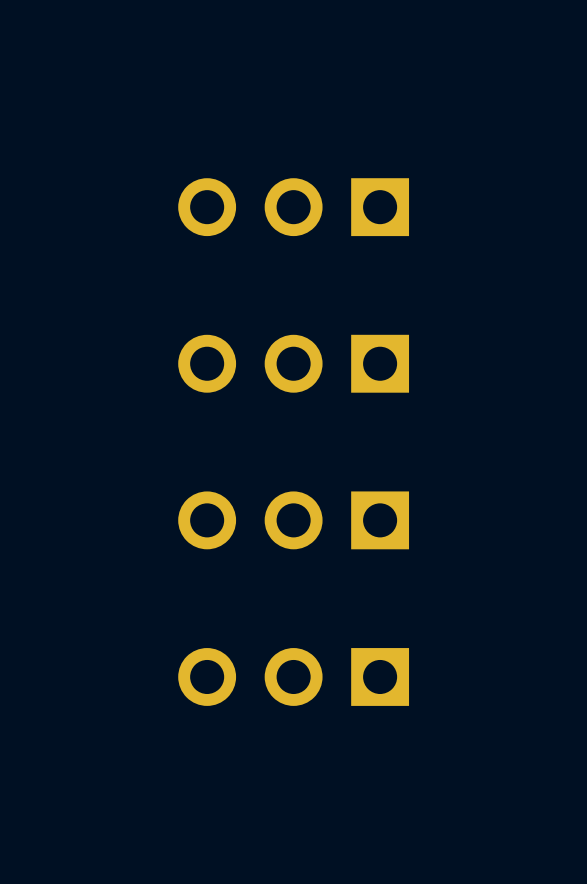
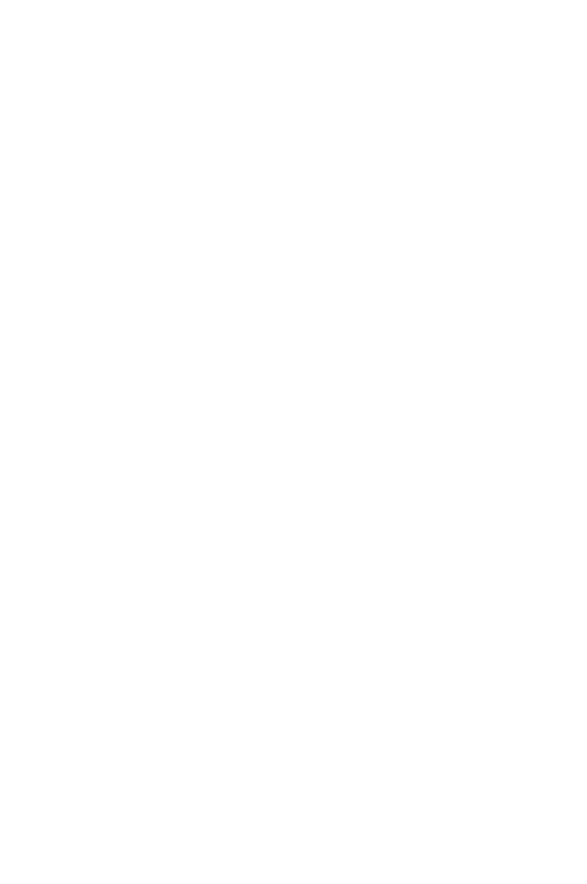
part: (293, 207) -> none
part: (293, 363) -> none
part: (293, 520) -> none
part: (293, 676) -> none

